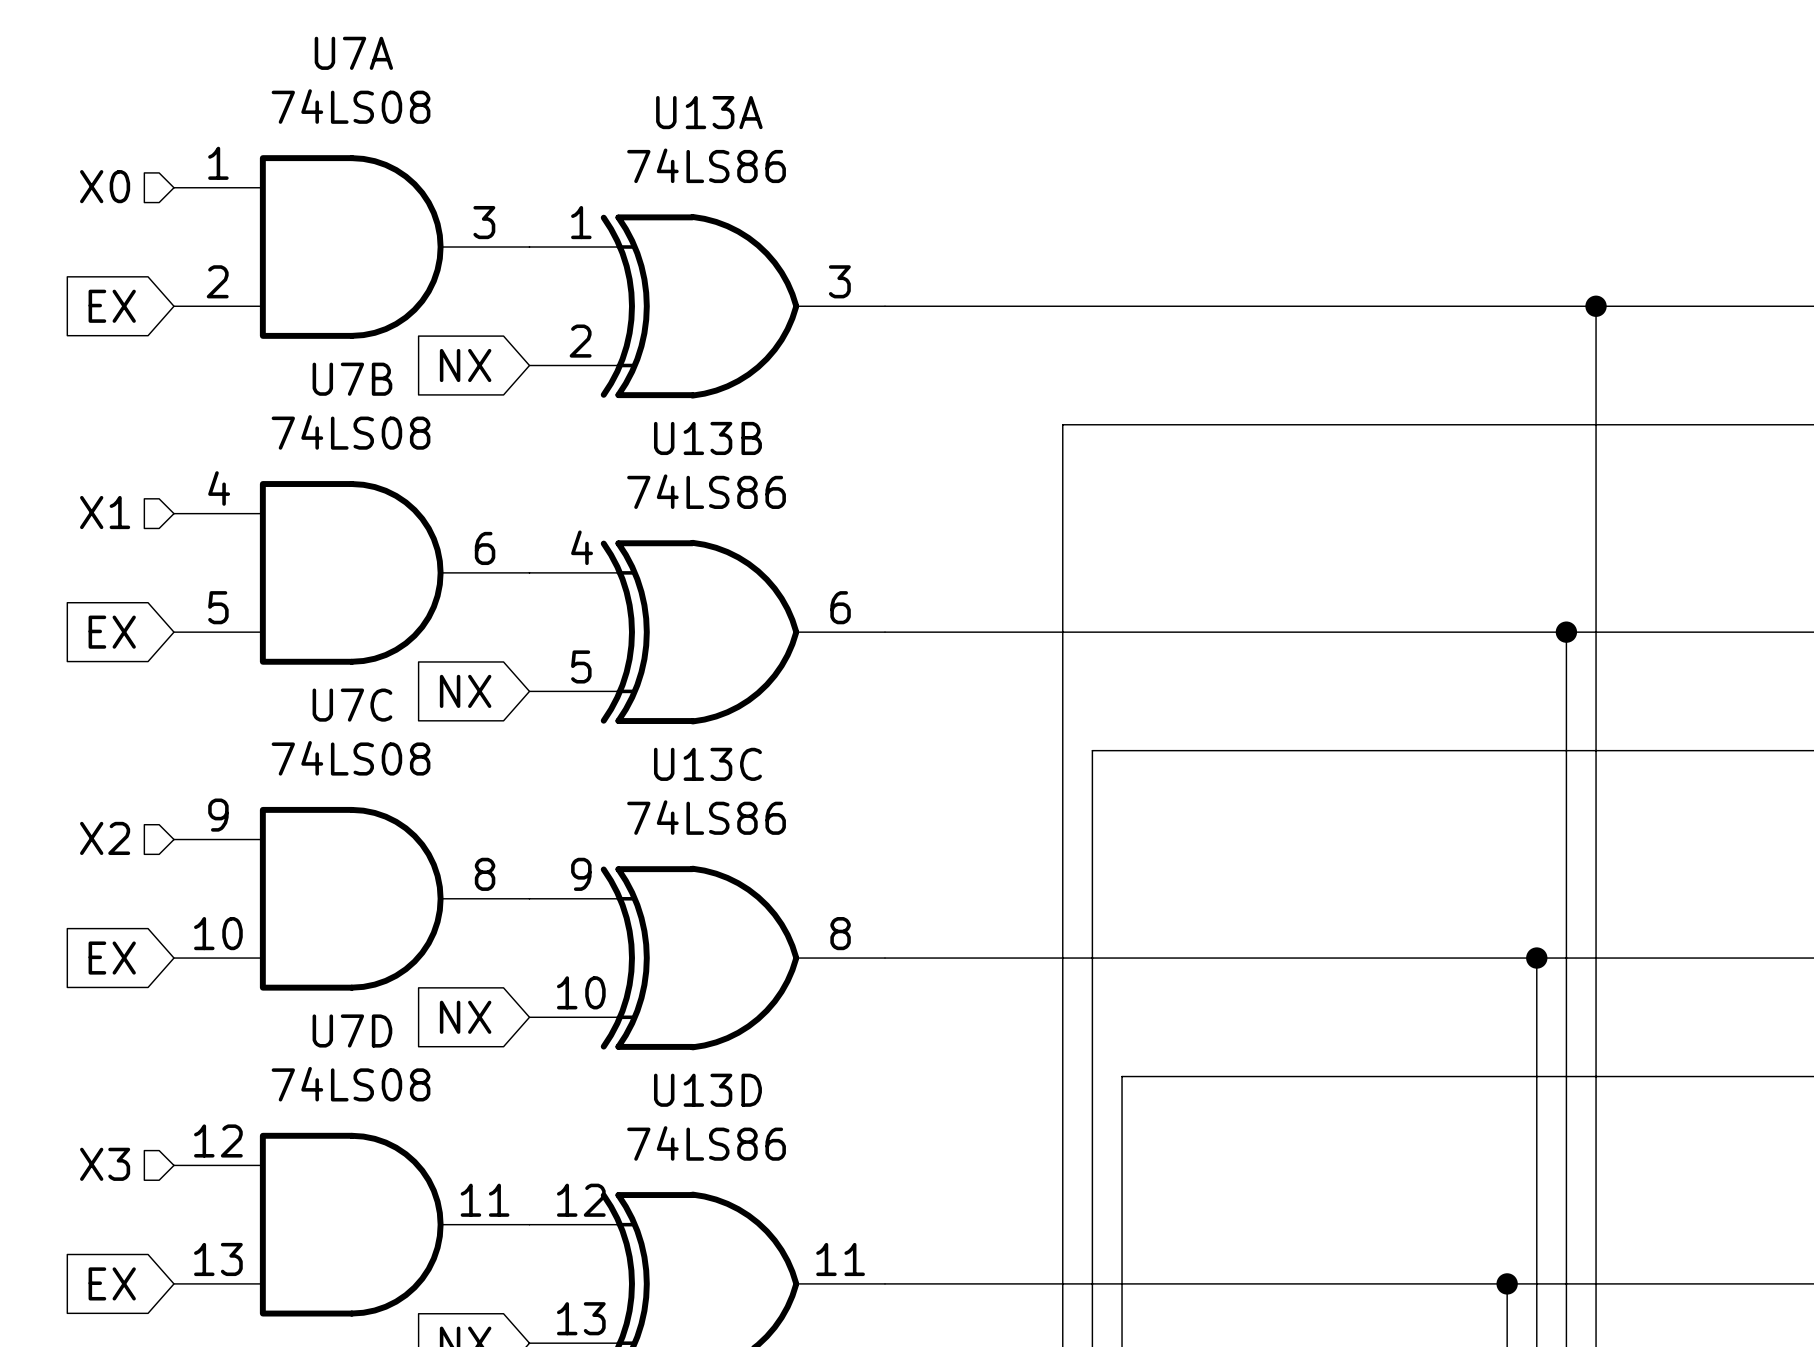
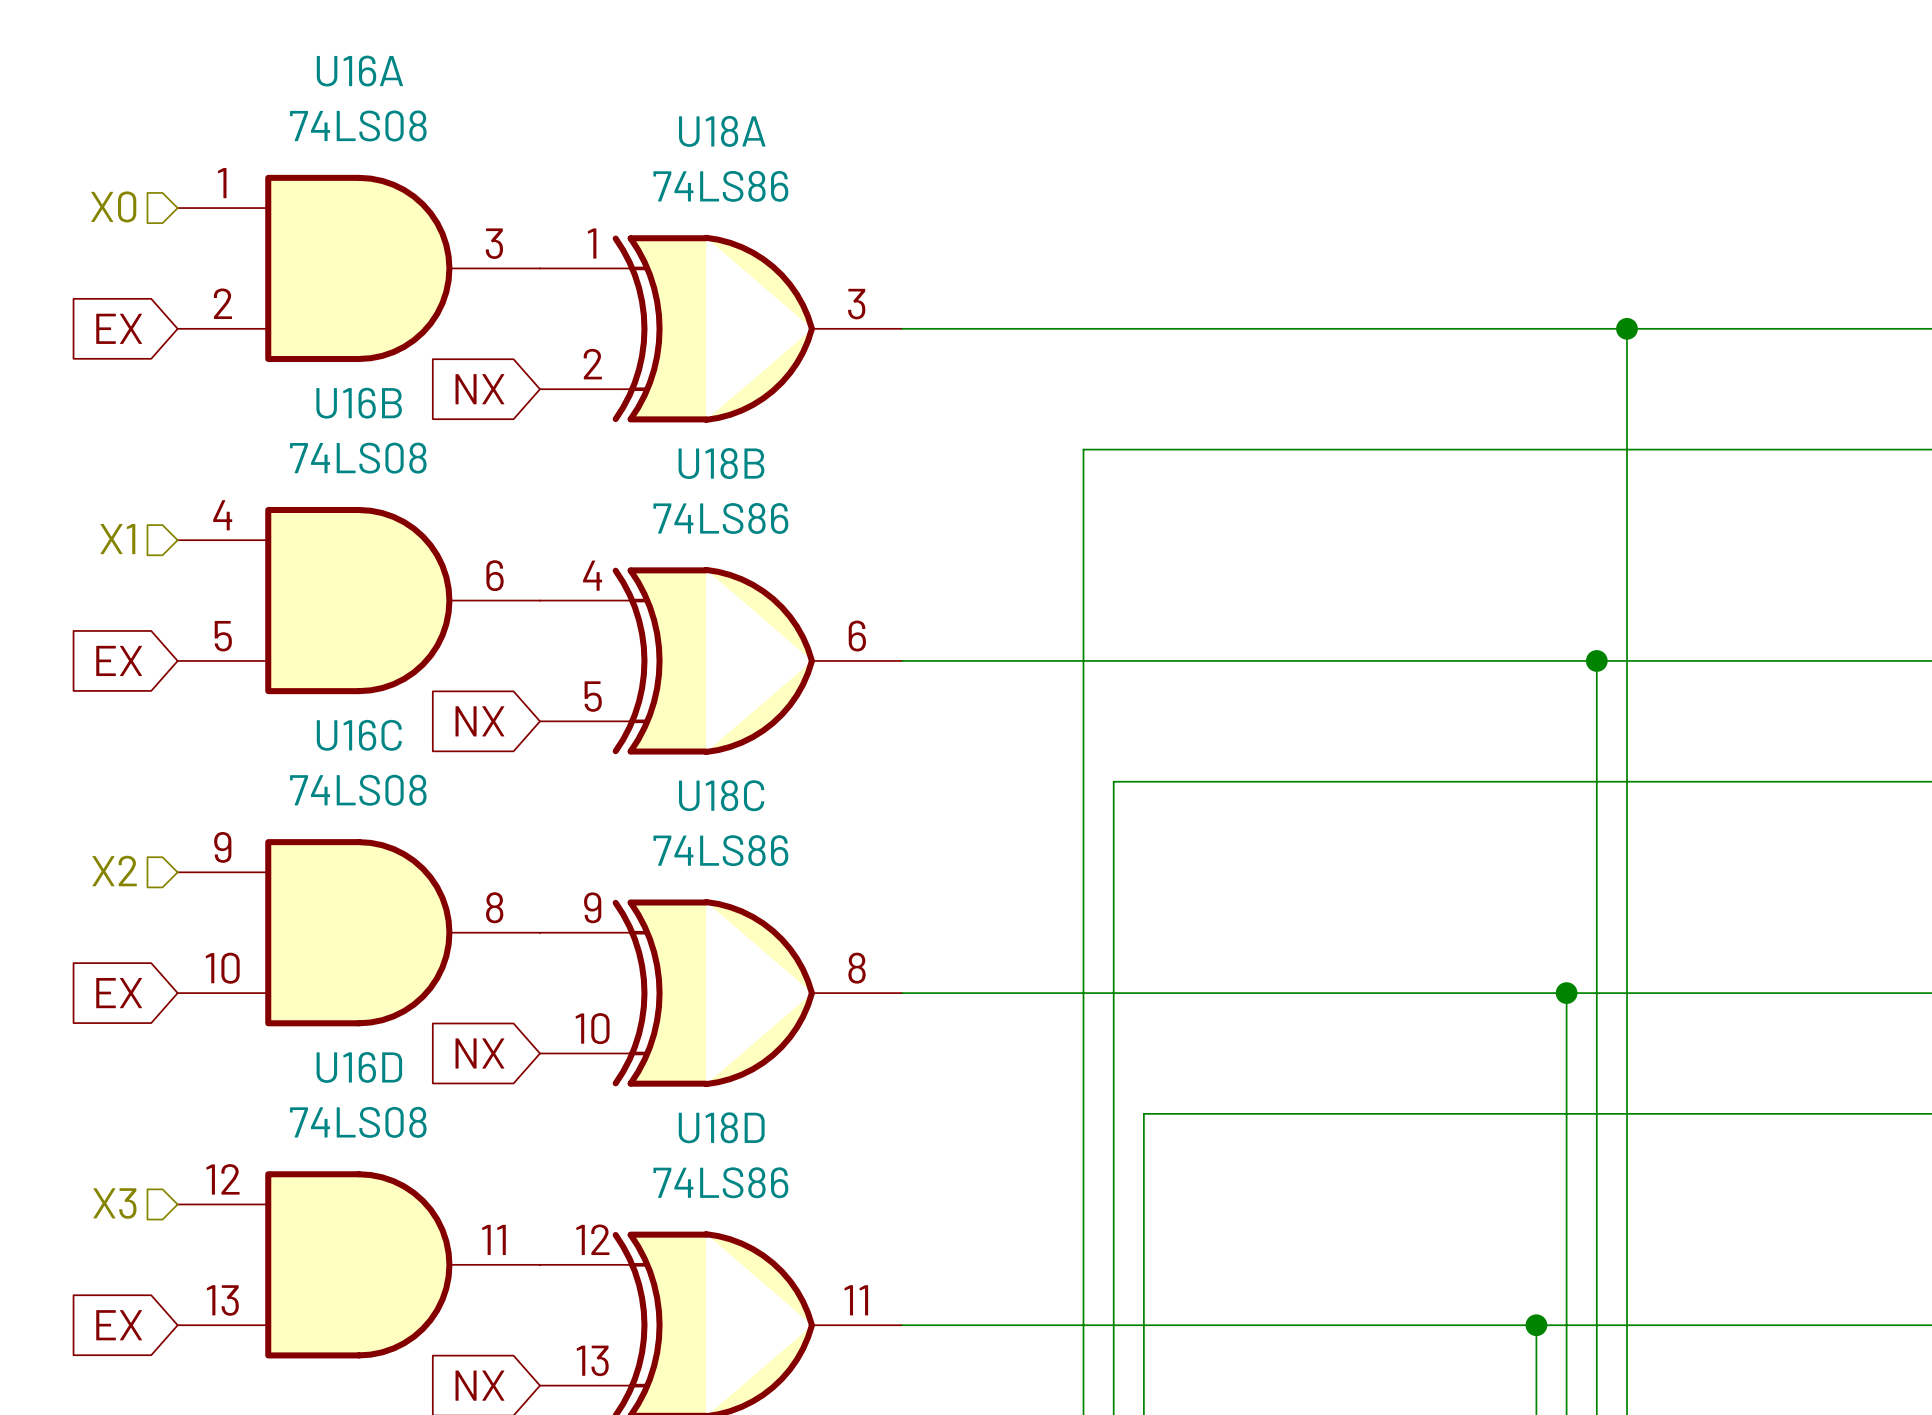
U7A name: U7A (353, 53) -> U16A (359, 71)
U13A name: U13A (709, 112) -> U18A (722, 131)
U7B name: U7B (352, 379) -> U16B (359, 403)
U13B name: U13B (707, 438) -> U18B (721, 463)
U7C name: U7C (352, 705) -> U16C (359, 735)
U13C name: U13C (707, 764) -> U18C (721, 795)
U7D name: U7D (352, 1030) -> U16D (359, 1067)
U13D name: U13D (707, 1090) -> U18D (721, 1127)

